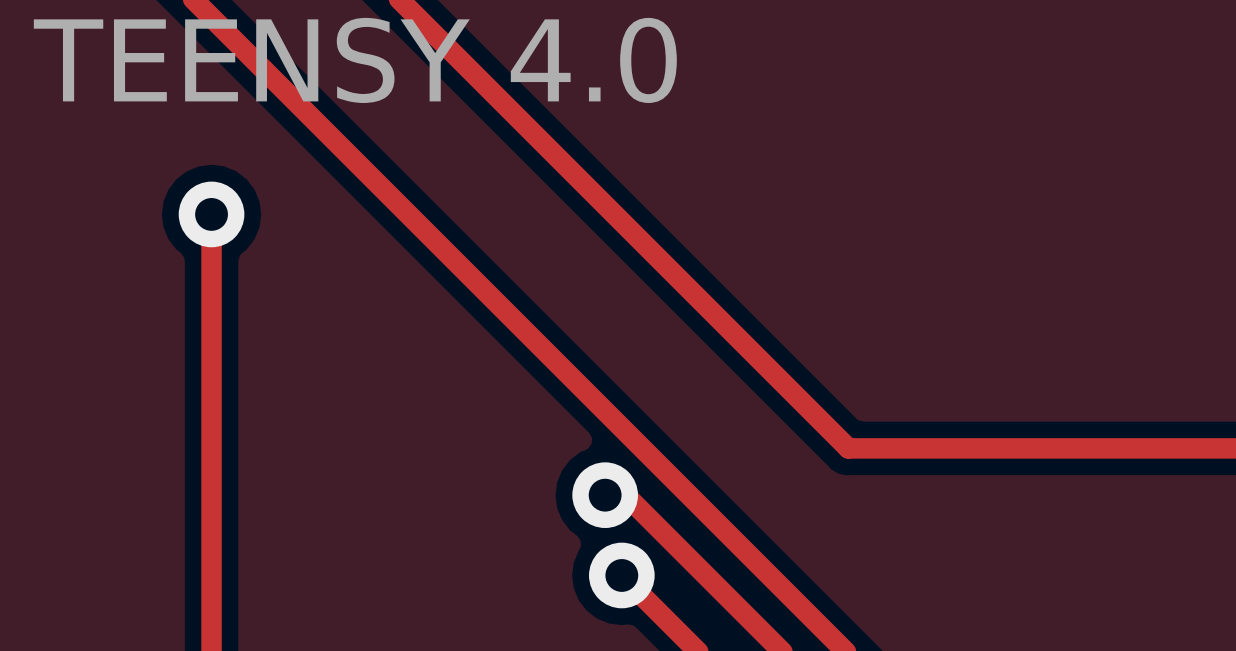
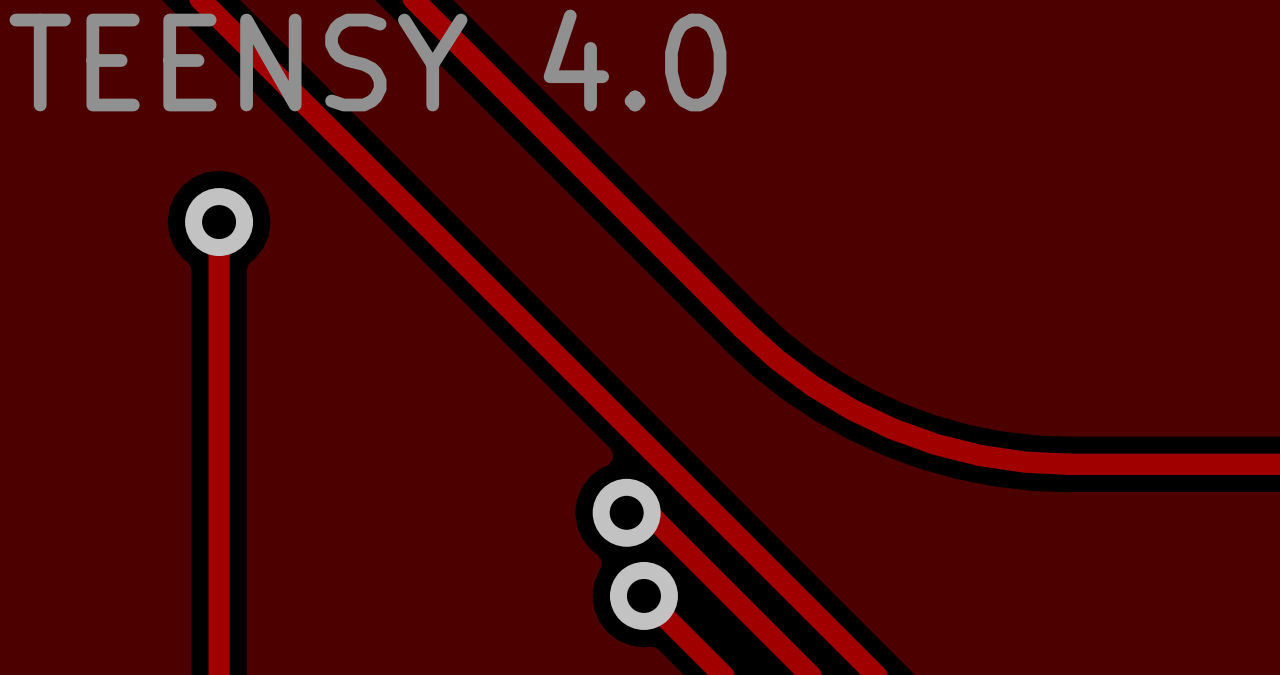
track: (717, 317) (848, 448) (1033, 448) -> (743, 328) (776, 359) (813, 386) (852, 409) (893, 429) (935, 444) (979, 455) (1024, 462) (1070, 464)

